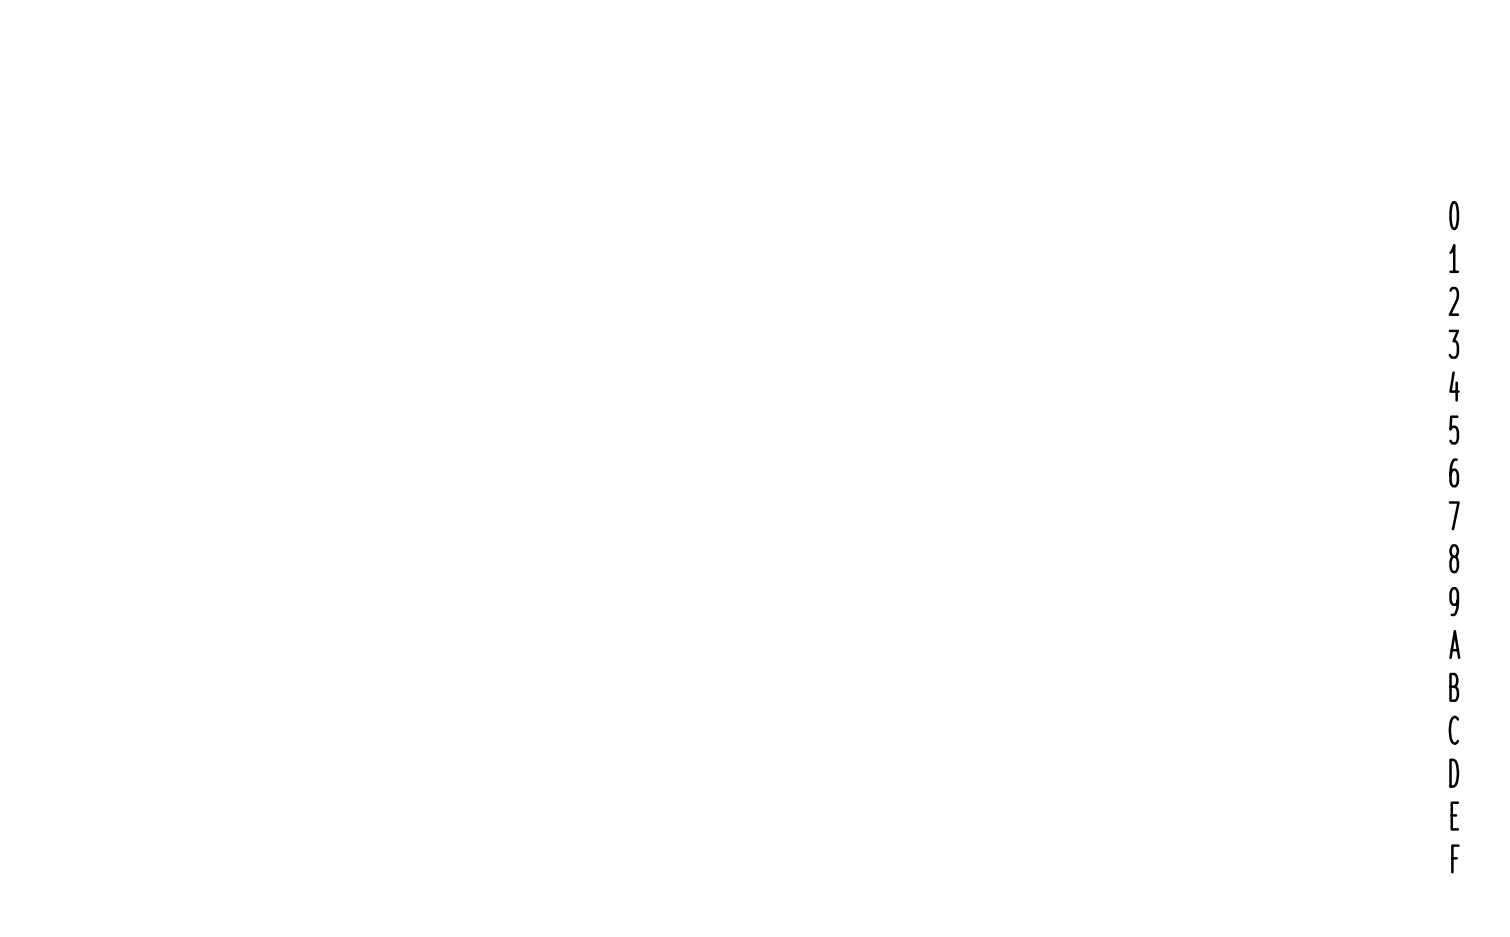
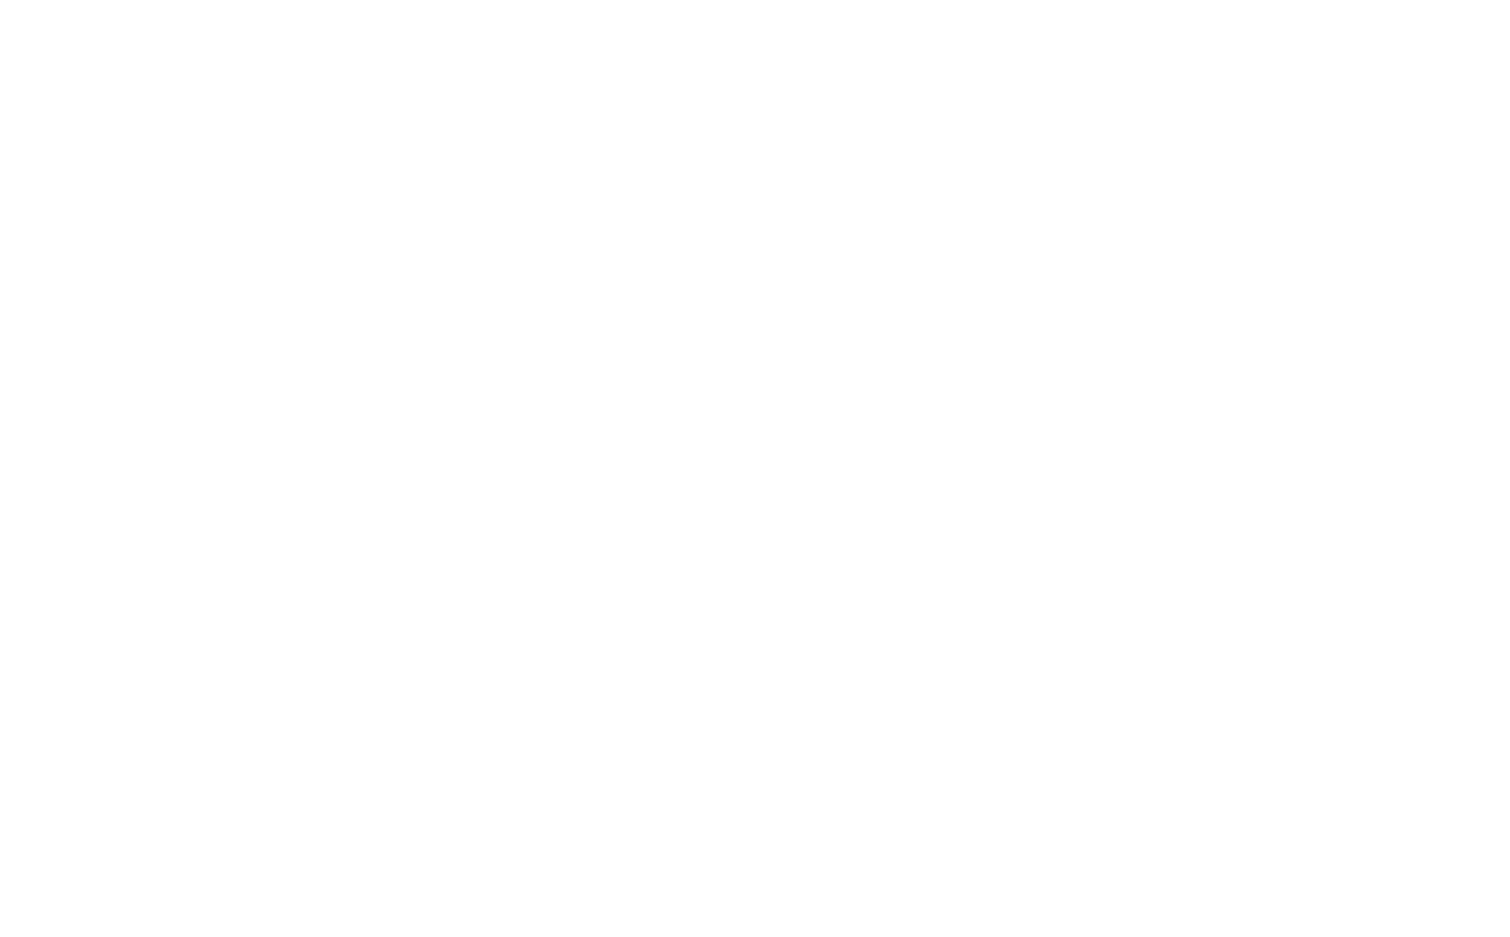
text: 0 (1454, 215) -> none
text: 1 (1454, 258) -> none
text: 2 (1453, 301) -> none
text: 3 (1453, 344) -> none
text: 4 (1454, 386) -> none
text: 5 (1454, 430) -> none
text: 6 (1454, 472) -> none
text: 7 (1454, 515) -> none
text: 8 (1454, 558) -> none
text: 9 (1454, 601) -> none
text: A (1454, 644) -> none
text: B (1454, 687) -> none
text: C (1453, 730) -> none
text: D (1454, 773) -> none
text: E (1454, 816) -> none
text: F (1455, 858) -> none

